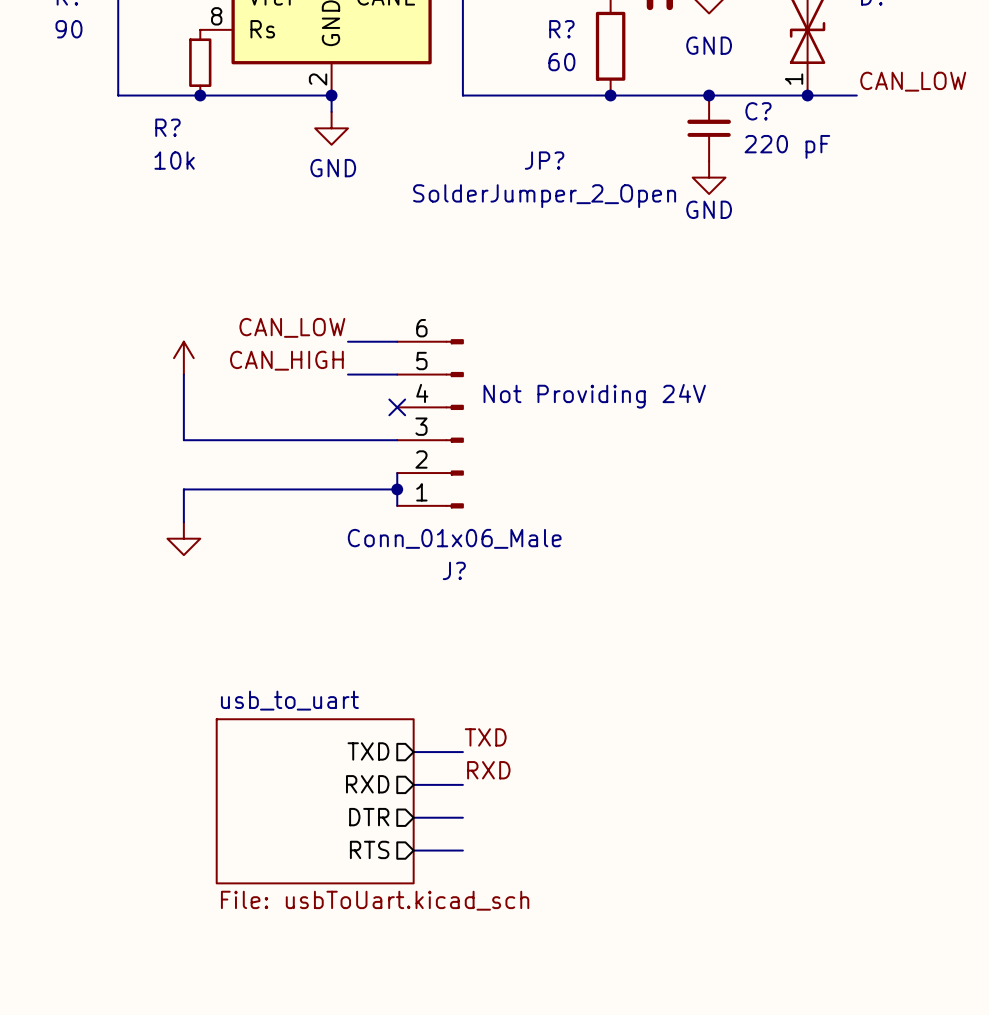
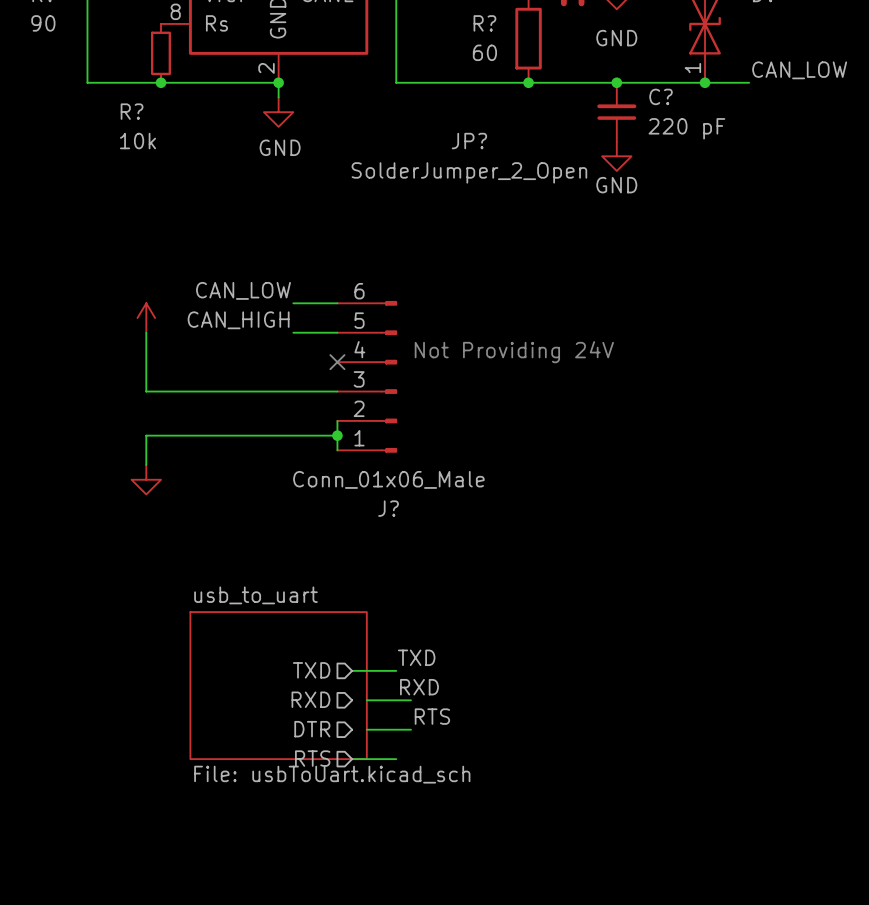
wire: (413, 784) (430, 784) -> (396, 700) (410, 700)
sheet usb_to_uart position: (315, 801) -> (278, 685)
label: none -> RTS (432, 716)
wire: (413, 817) (430, 817) -> (396, 729) (410, 729)

